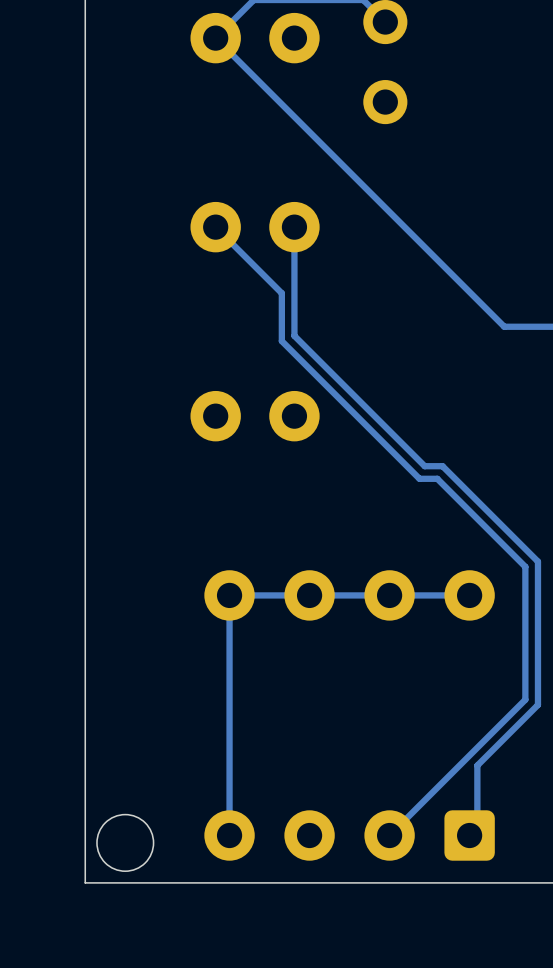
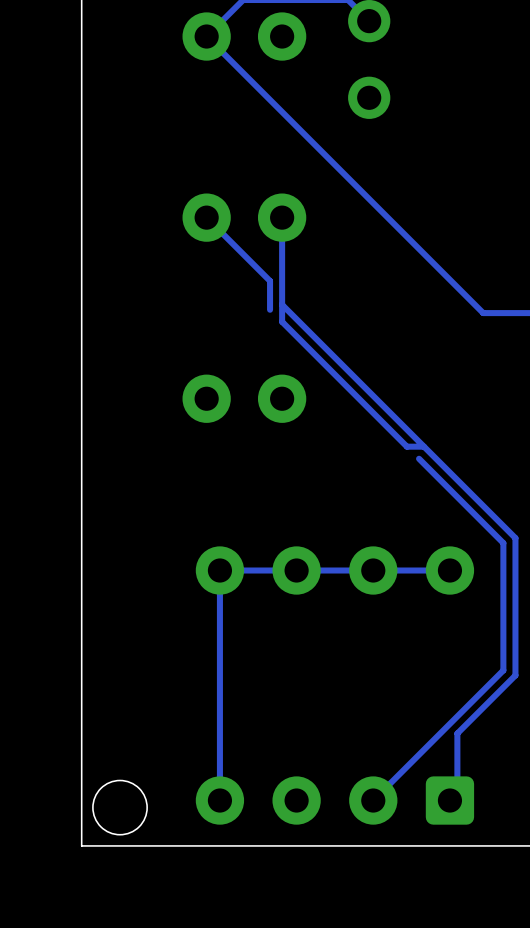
track: none -> (282, 304) (424, 446)
track: (281, 323) (281, 341) (419, 478) (437, 478) -> none

